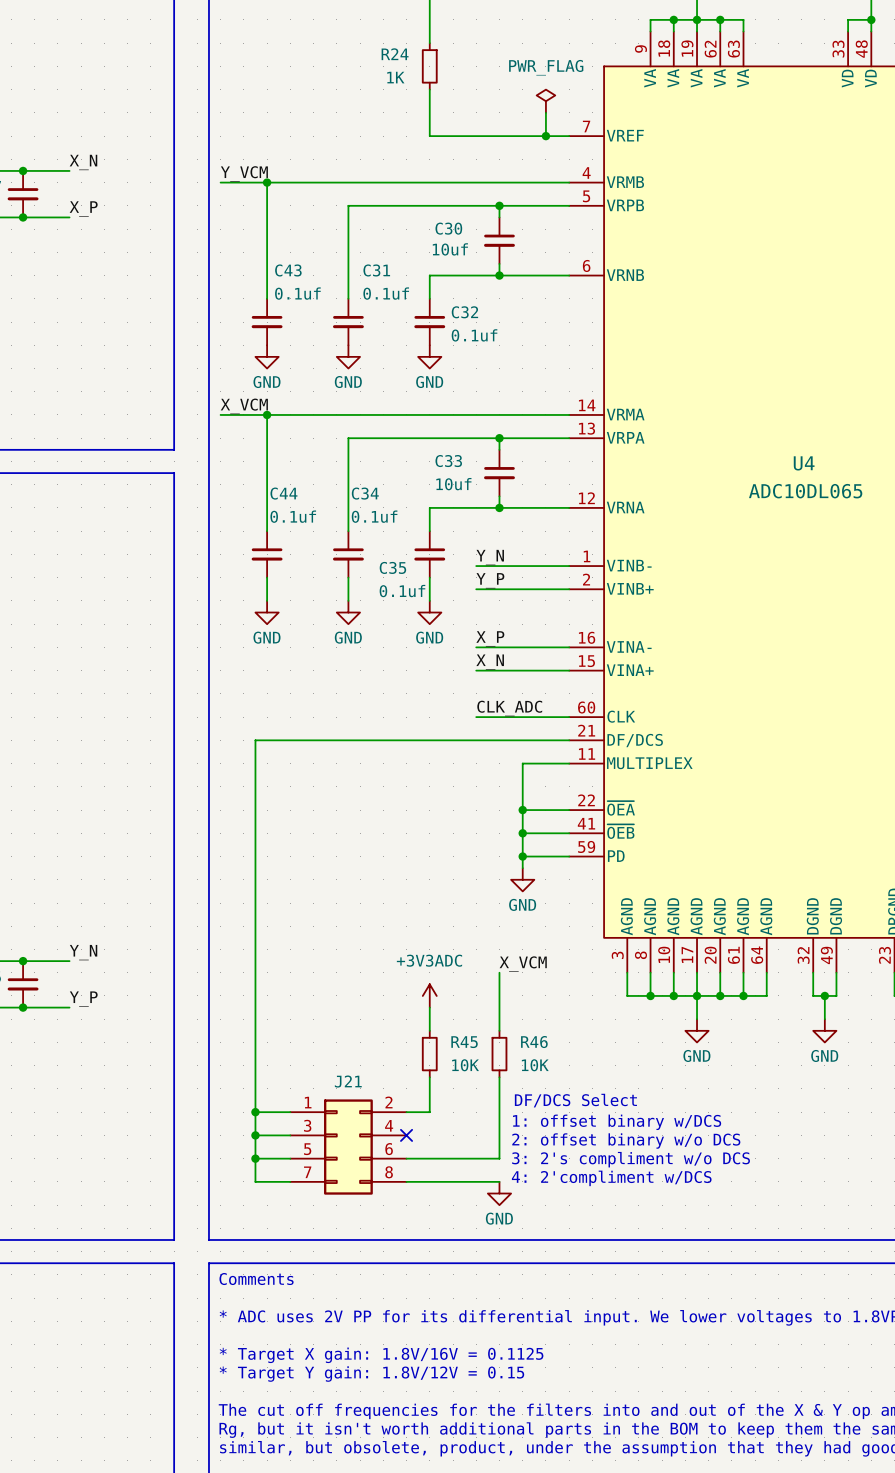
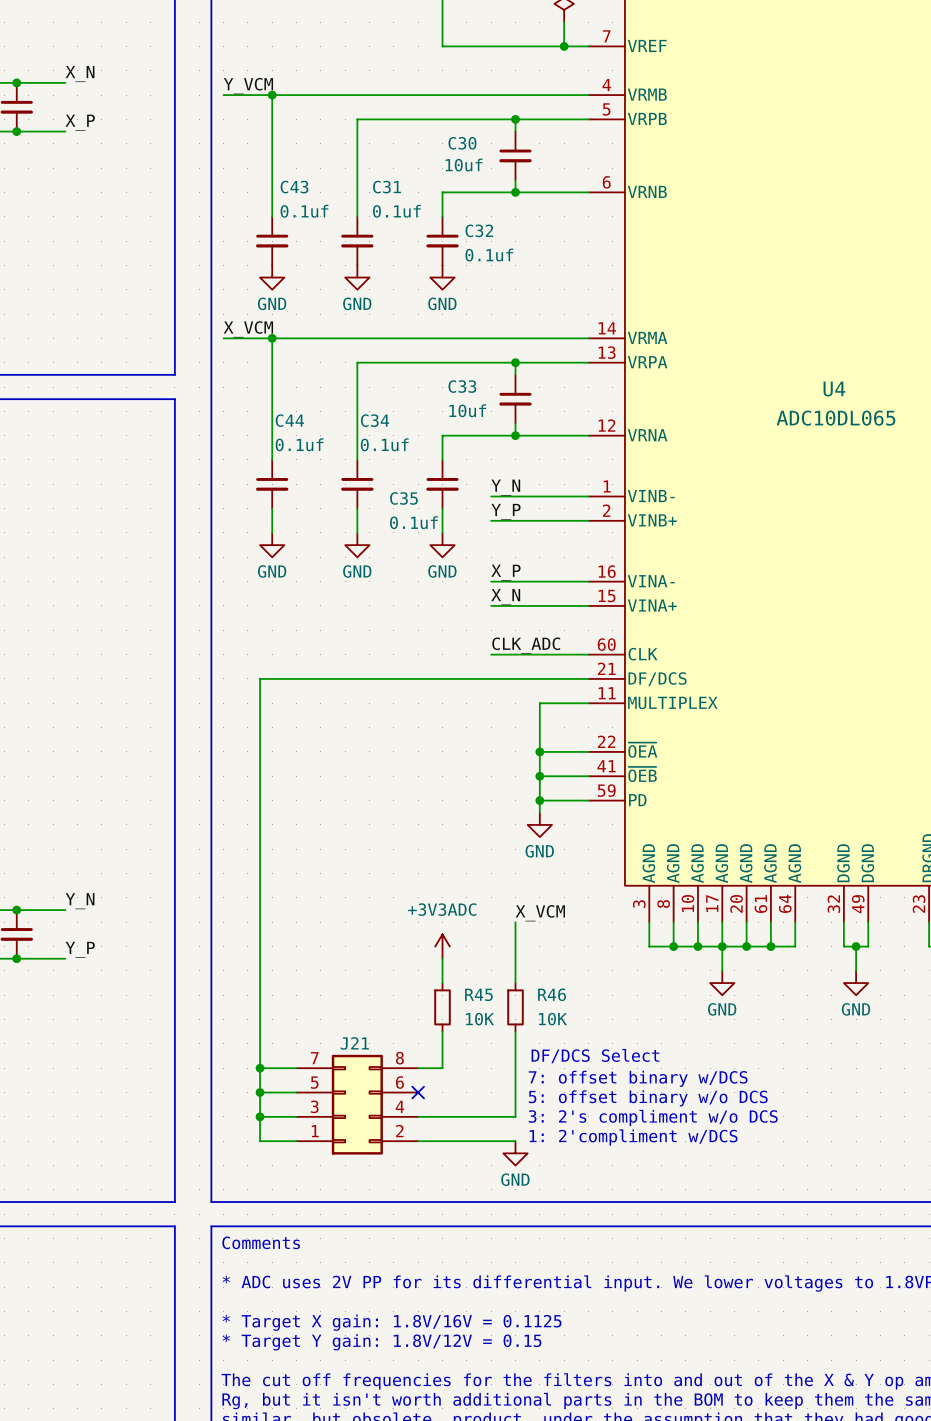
text: 1: offset binary w/DCS (617, 1122) -> 7: offset binary w/DCS (638, 1078)
text: 2: offset binary w/o DCS (626, 1141) -> 5: offset binary w/o DCS (648, 1098)
J21 flip: as is (348, 1147) -> up-down (357, 1104)
text: 4: 2'compliment w/DCS (611, 1178) -> 1: 2'compliment w/DCS (633, 1137)

